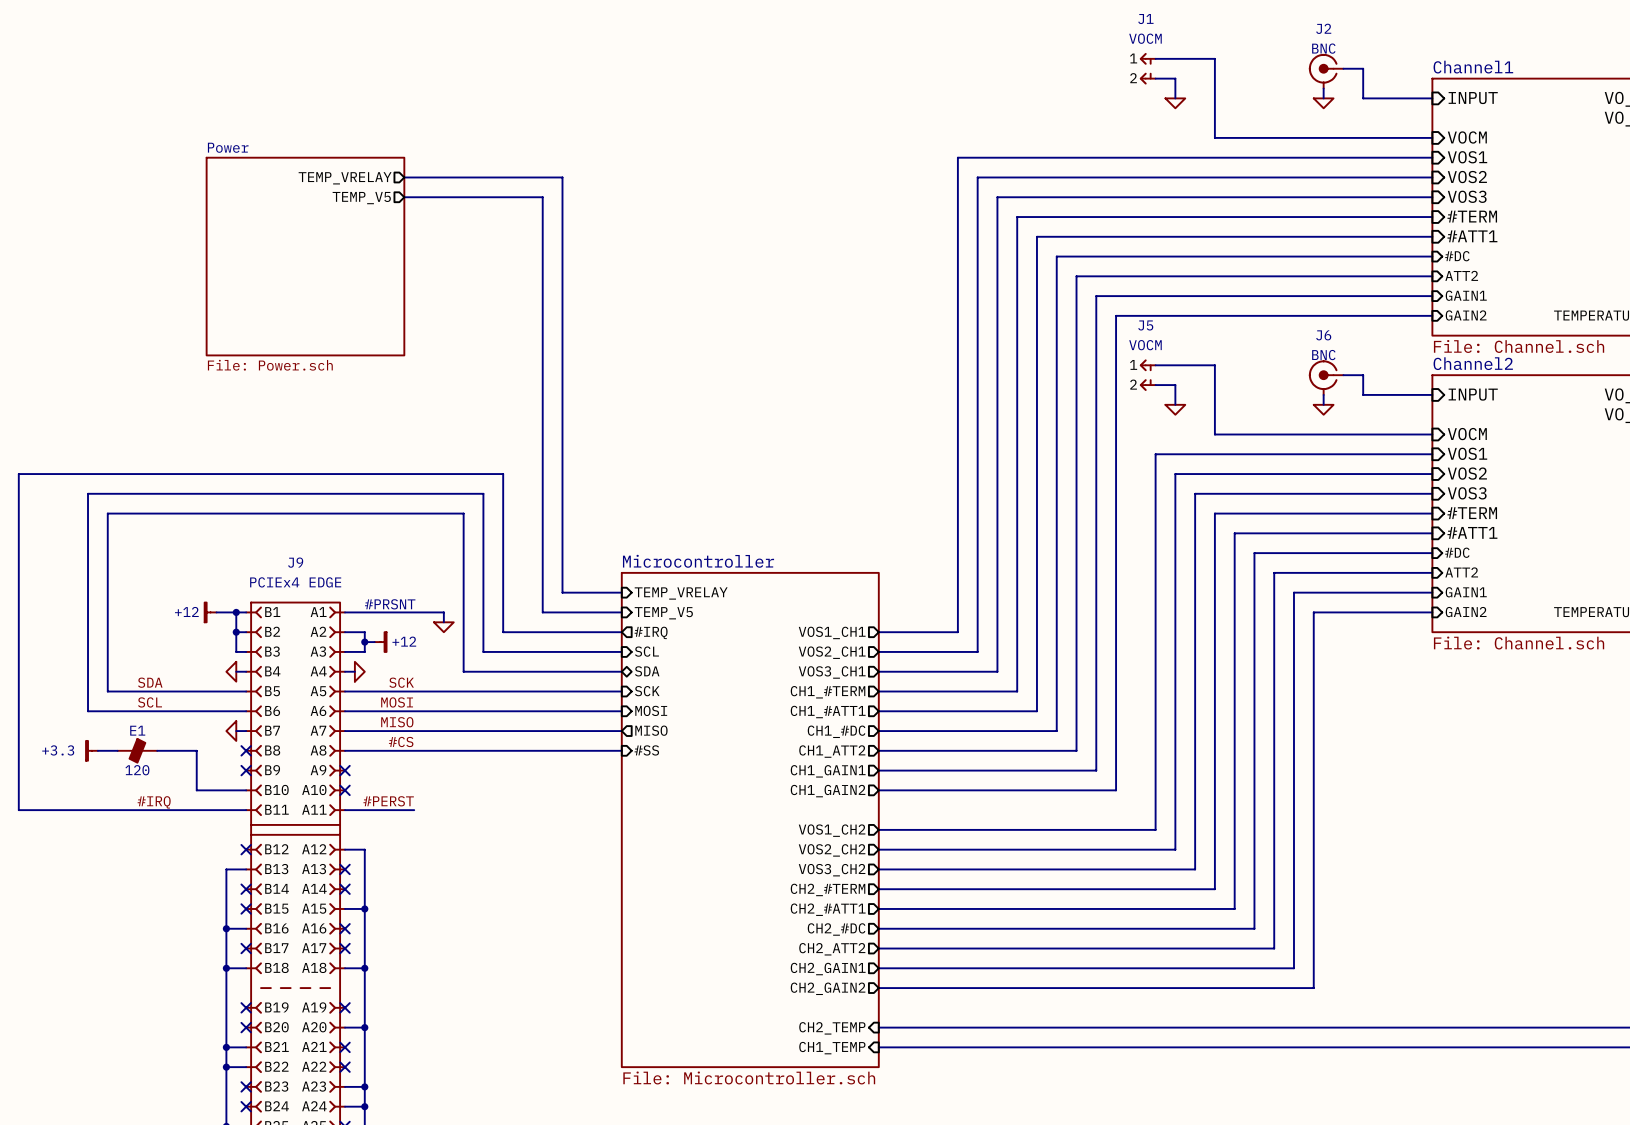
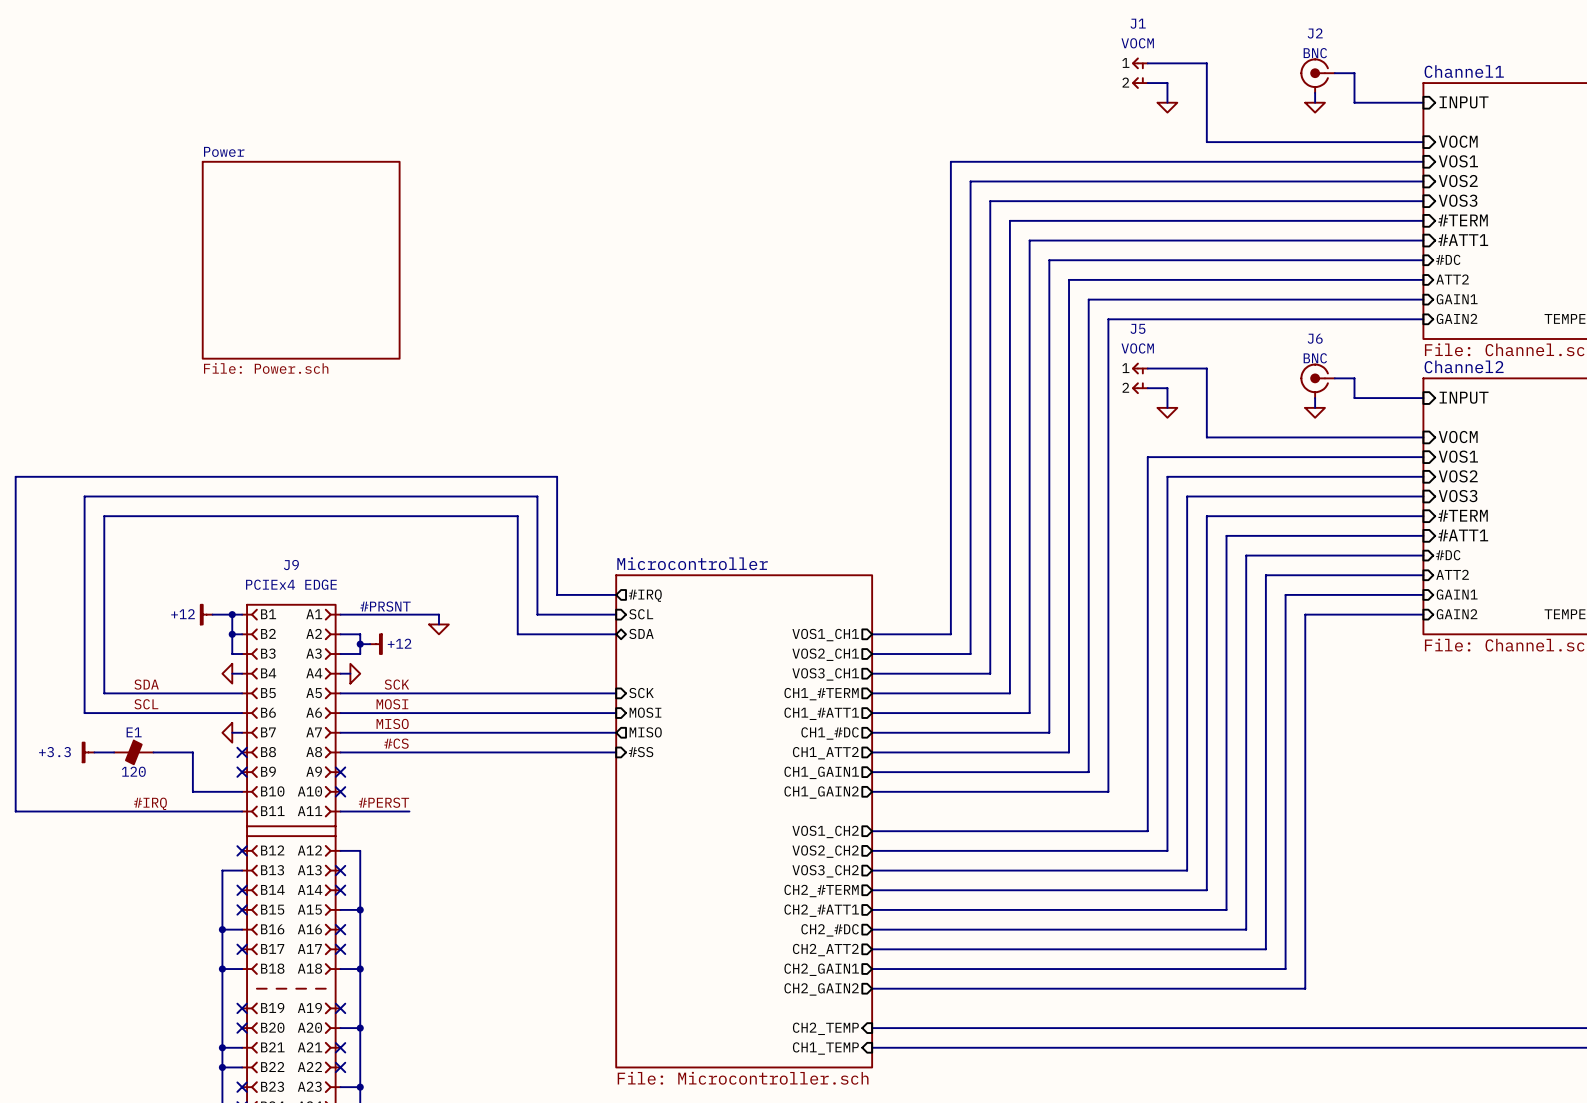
wire: (404, 177) (562, 177) (562, 474) -> (498, 476) (557, 476)
sheet pin: TEMP_VRELAY (345, 178) -> none
wire: (404, 197) (542, 197) (542, 493) -> none
sheet pin: TEMP_V5 (361, 198) -> none
wire: (503, 474) (503, 632) (522, 632) -> (458, 516) (517, 516) (517, 634)
wire: (483, 493) (483, 651) (621, 651) -> (478, 496) (537, 496)
wire: (463, 513) (463, 671) (621, 671) -> none
sheet pin shape: input (681, 593) -> output (645, 595)
sheet pin: TEMP_VRELAY (681, 593) -> #IRQ (645, 595)
sheet pin: TEMP_V5 (663, 613) -> SCL (641, 614)
sheet pin shape: output (651, 632) -> bidirectional (641, 633)
sheet pin: #IRQ (651, 632) -> SDA (641, 633)
sheet pin: SCL (646, 651) -> none
sheet pin: SDA (647, 671) -> none

